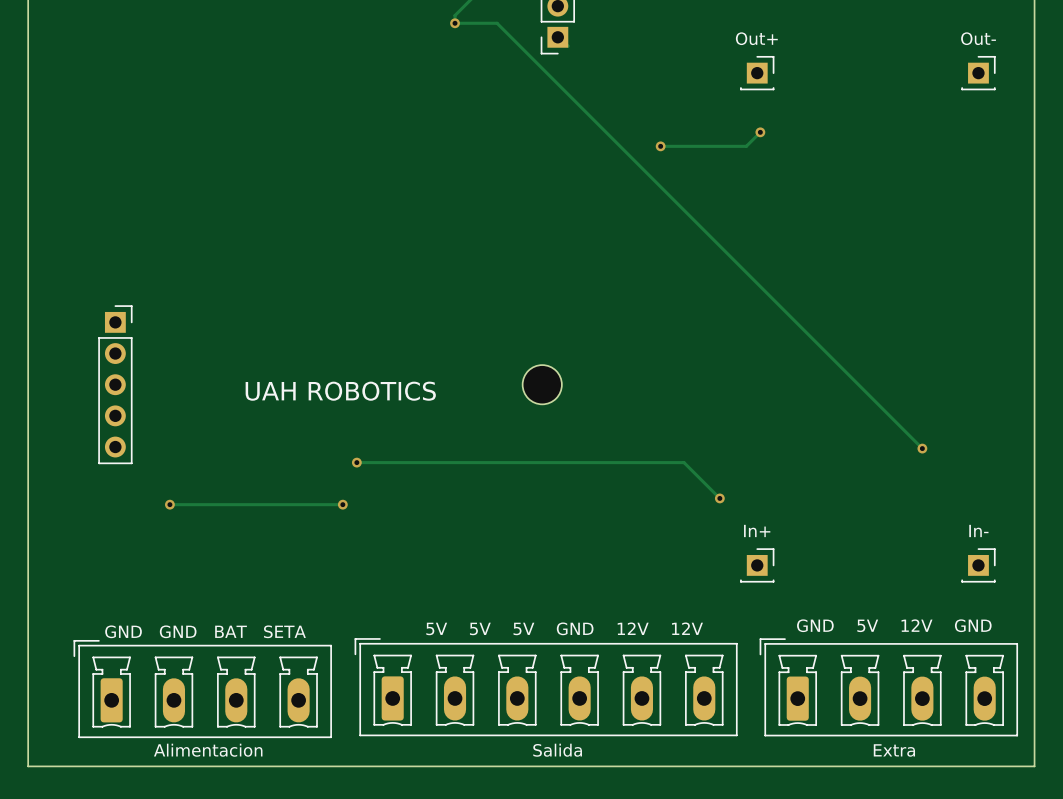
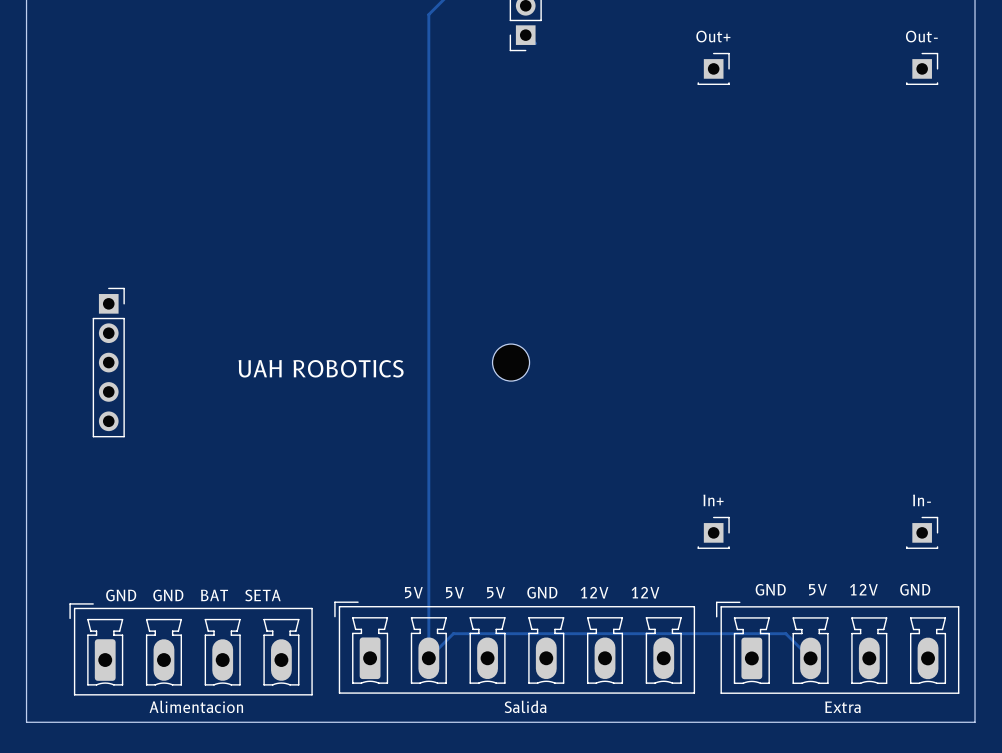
track: (455, 23) (497, 23) (922, 448) -> (428, 21) (428, 658) (453, 633) (785, 633) (810, 658)
via: (455, 23) -> none
track: (760, 132) (746, 146) (660, 146) -> none
via: (760, 132) -> none
via: (660, 146) -> none
via: (922, 448) -> none
track: (356, 462) (684, 462) (719, 498) -> none
via: (356, 462) -> none
via: (719, 498) -> none
track: (169, 504) (342, 504) -> none
via: (169, 504) -> none
via: (342, 504) -> none

